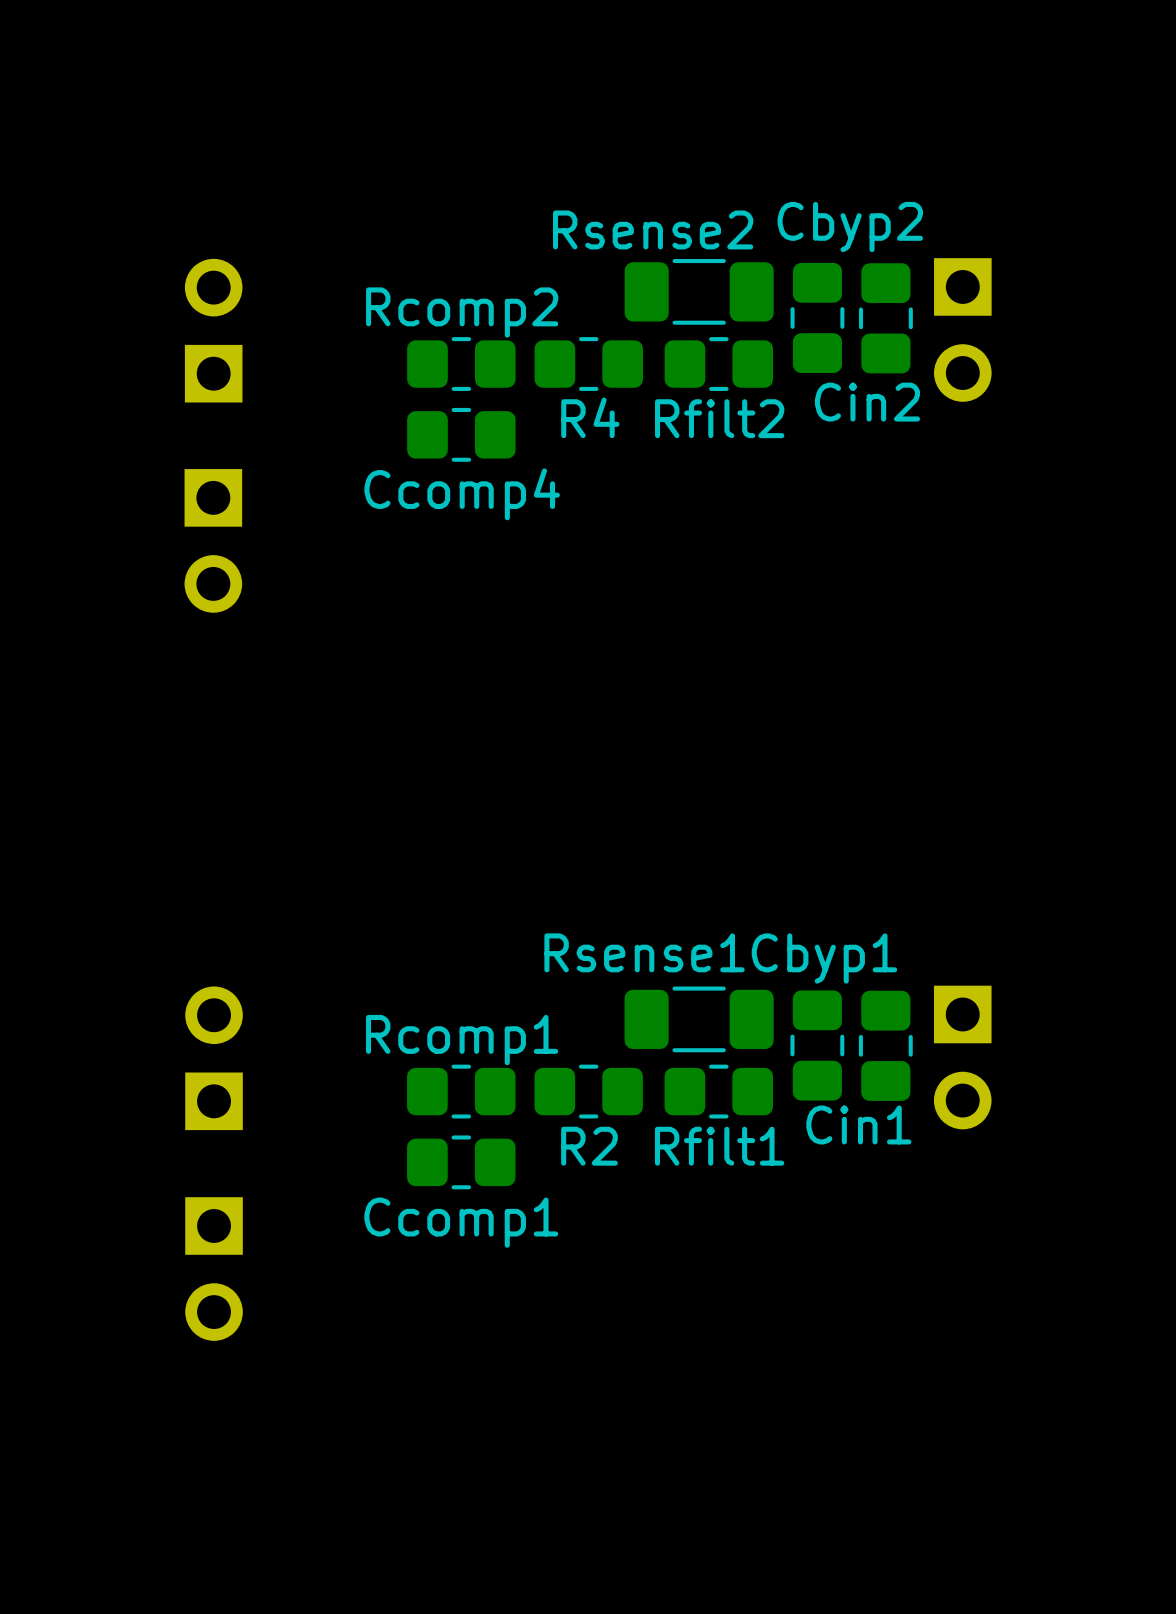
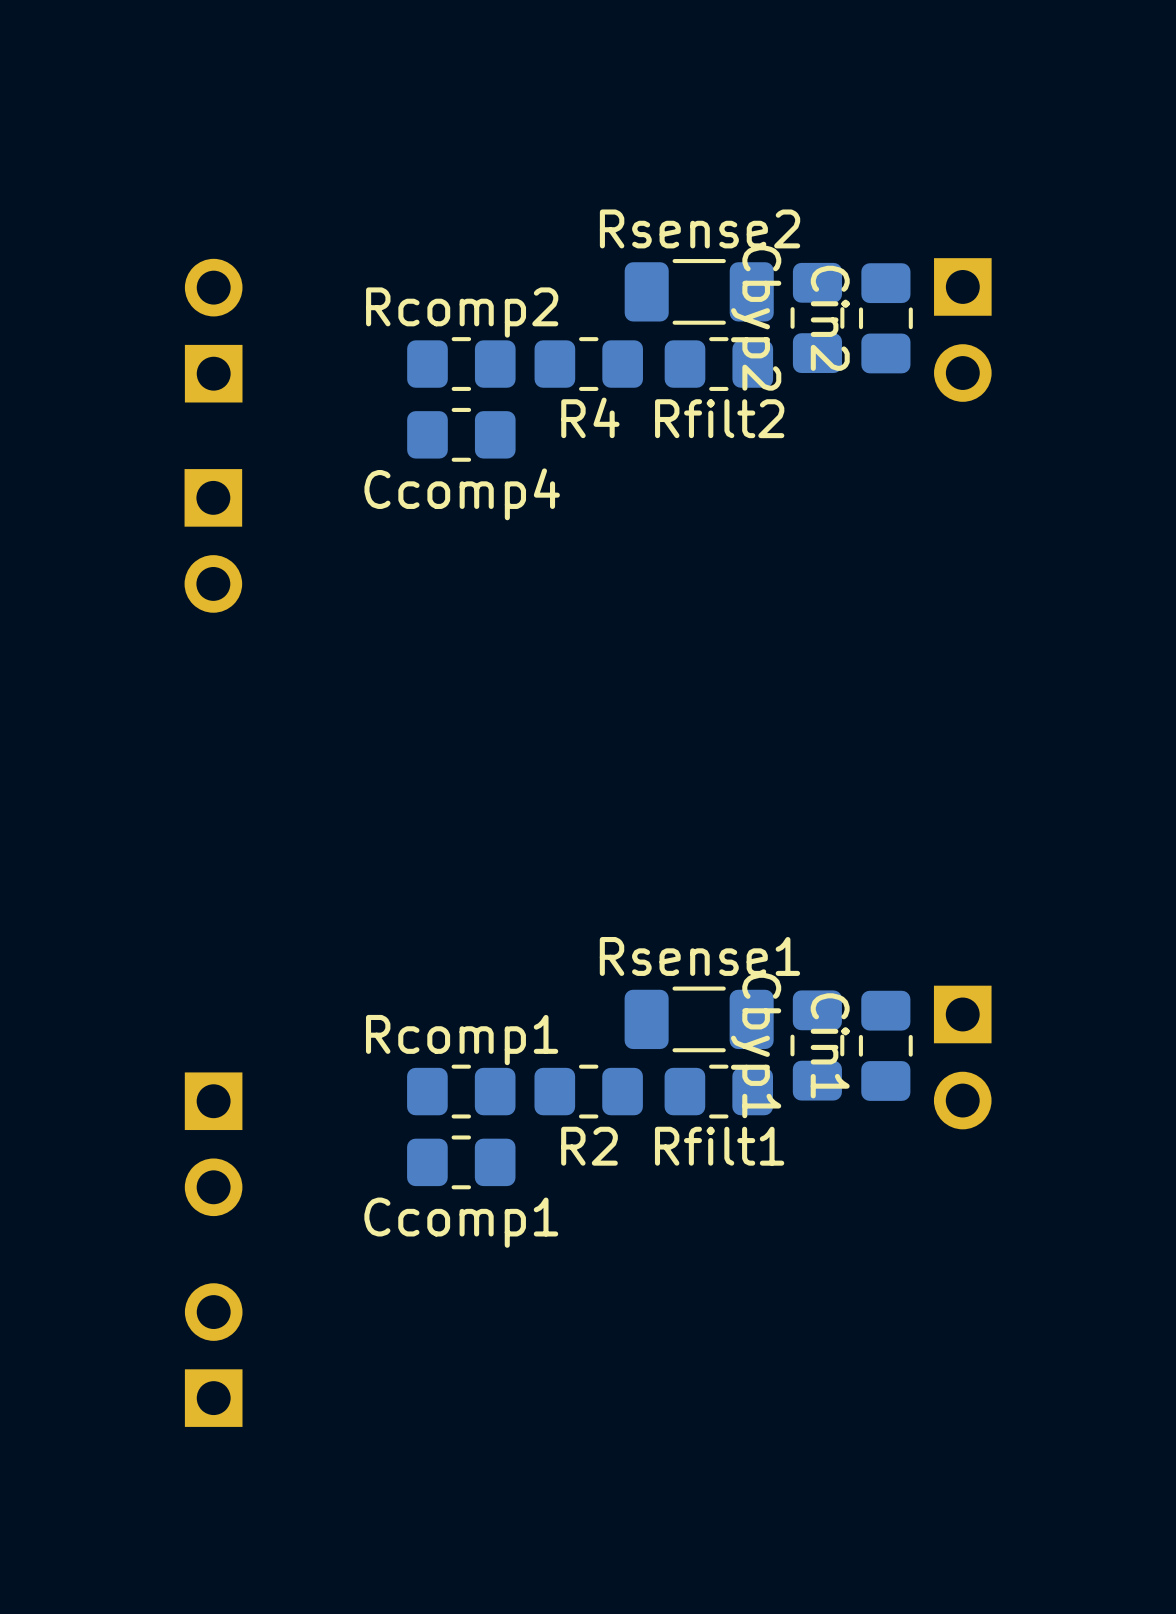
Cbyp2 name rotation: 0° (850, 226) -> 90° clockwise (756, 317)
Rsense2 name position: Rsense2 (653, 229) -> Rsense2 (700, 228)
Cin2 name rotation: 0° (867, 402) -> 90° clockwise (830, 318)
Rsense1 name position: Rsense1 (644, 952) -> Rsense1 (699, 956)
Cbyp1 name rotation: 0° (824, 958) -> 90° clockwise (756, 1045)
part: (214, 1058) -> none
Cin1 name rotation: 0° (858, 1124) -> 90° clockwise (830, 1045)
part: none -> (213, 1144)
part: (214, 1269) -> none
part: none -> (213, 1355)

